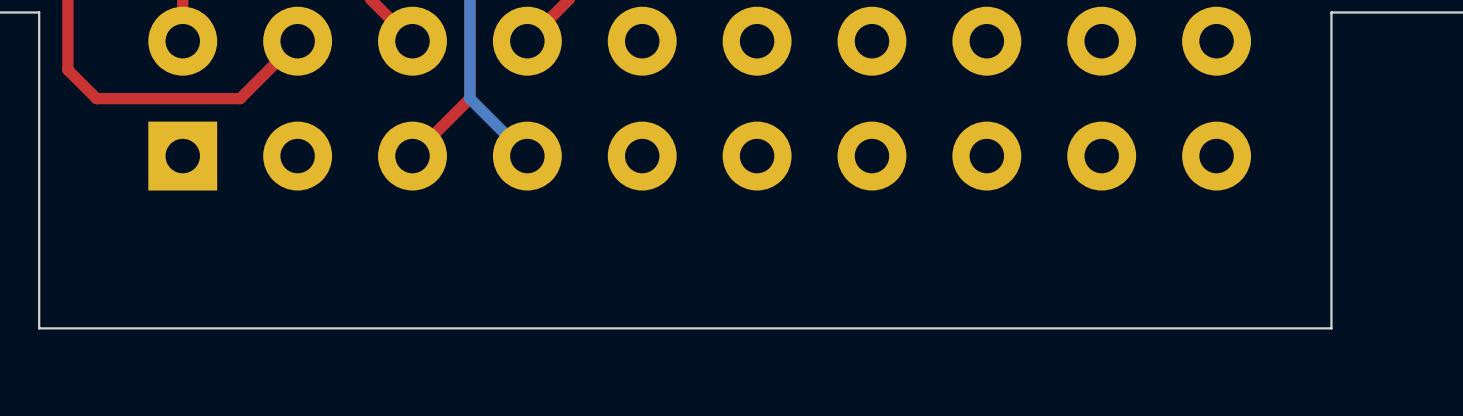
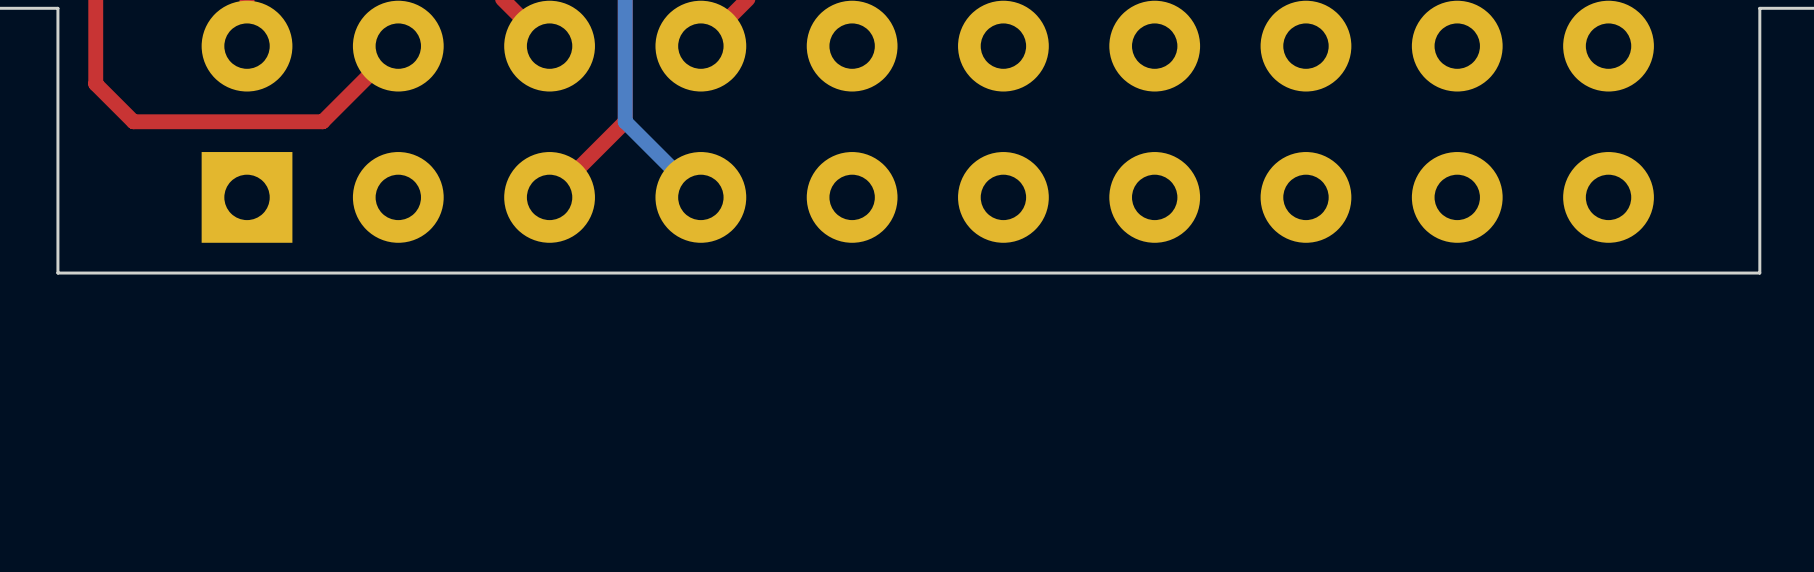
board edge: (1331, 213) (1331, 328) (39, 328) (39, 213) -> (1759, 273) (57, 273)

